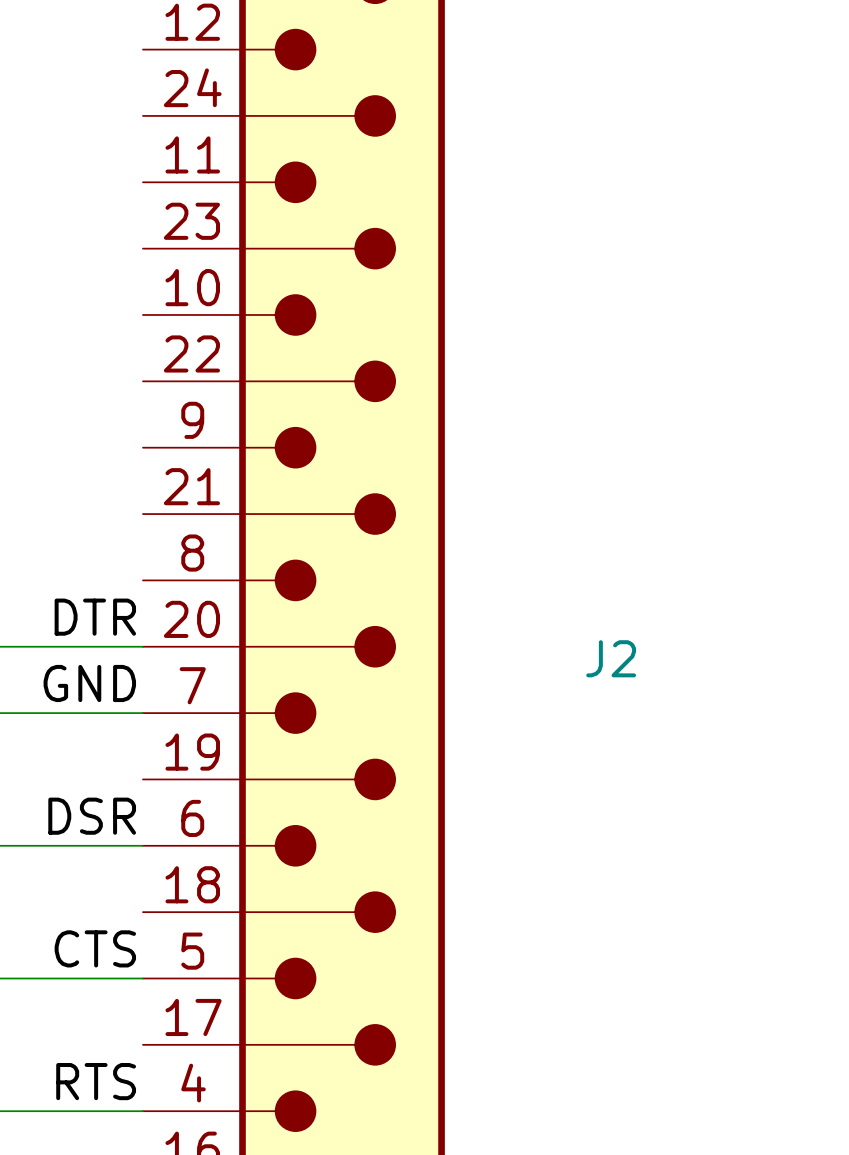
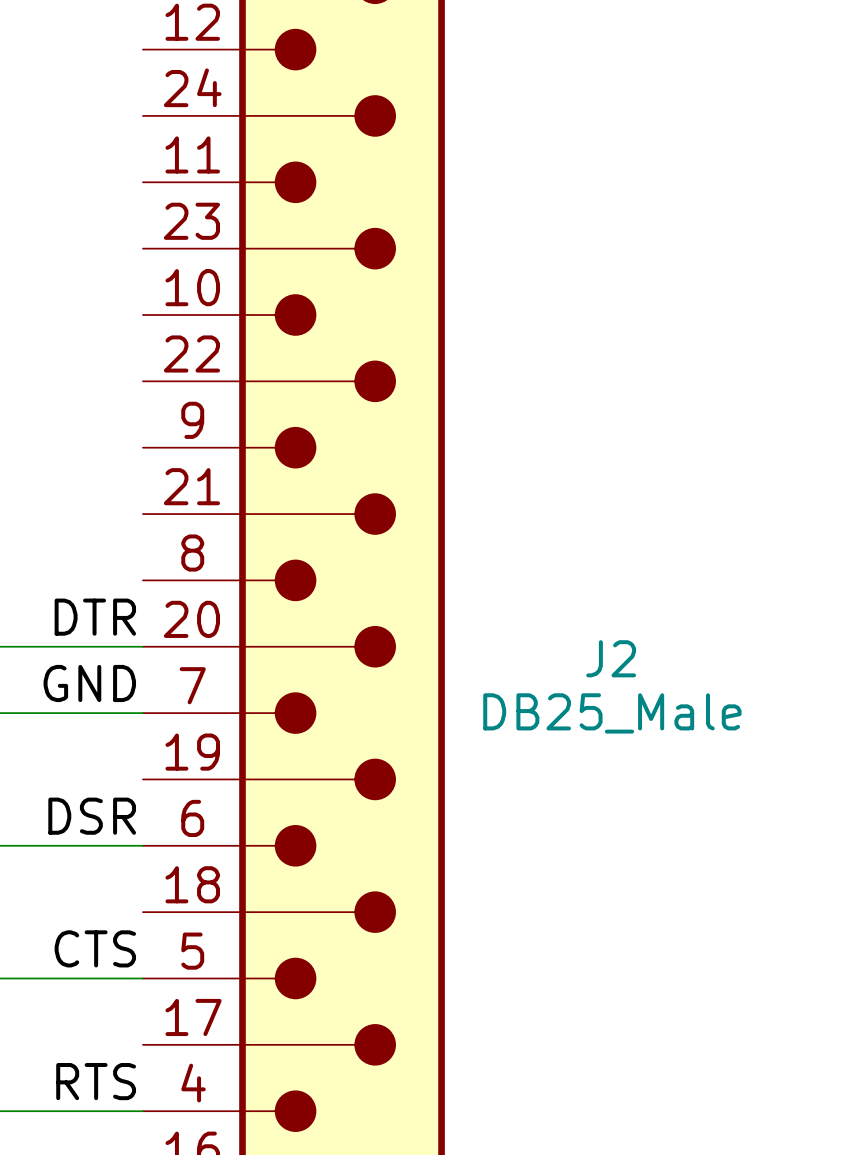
J2 value: none -> DB25_Male (612, 713)

